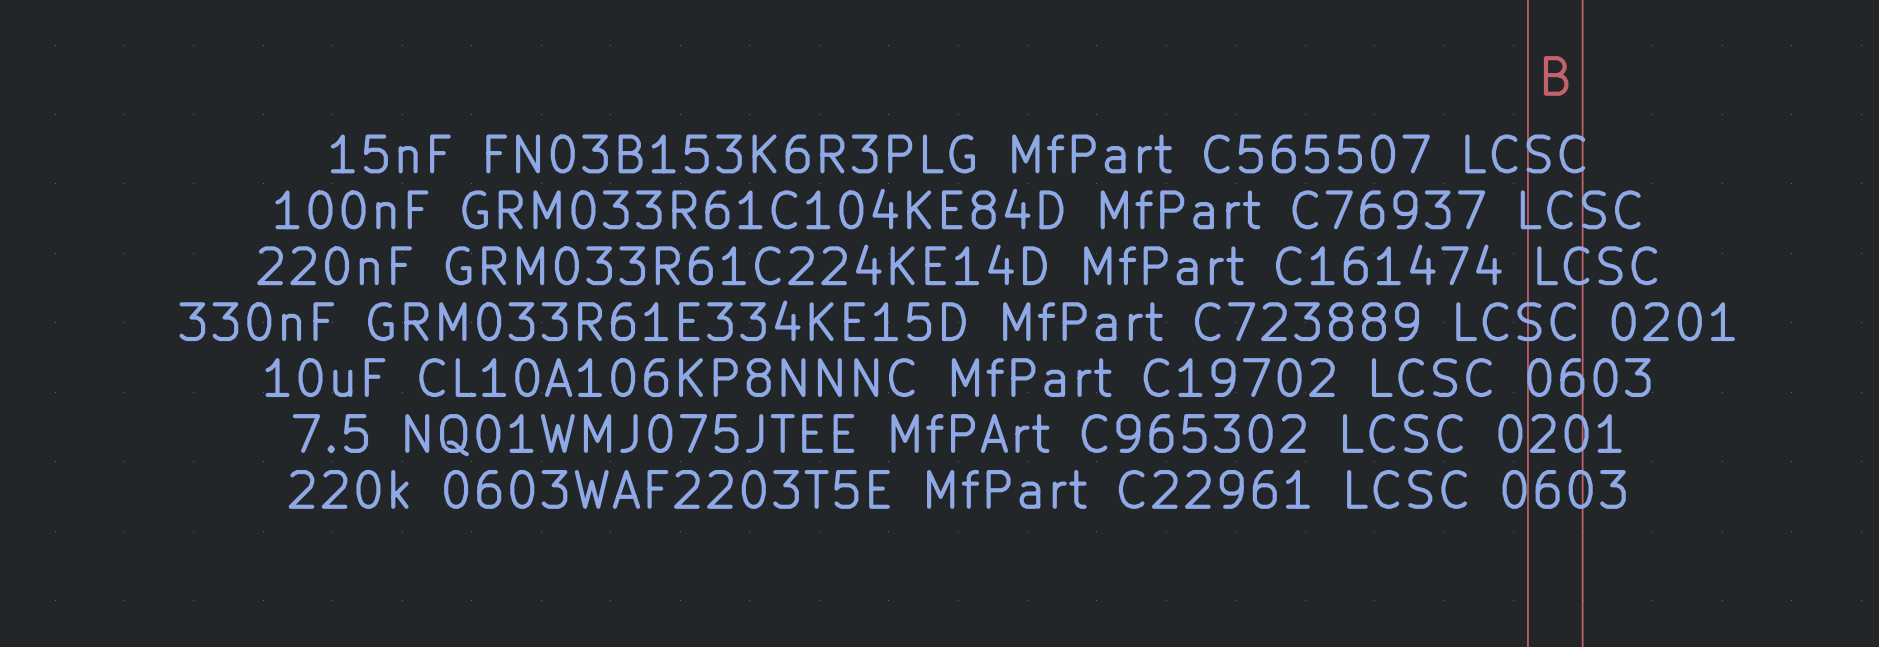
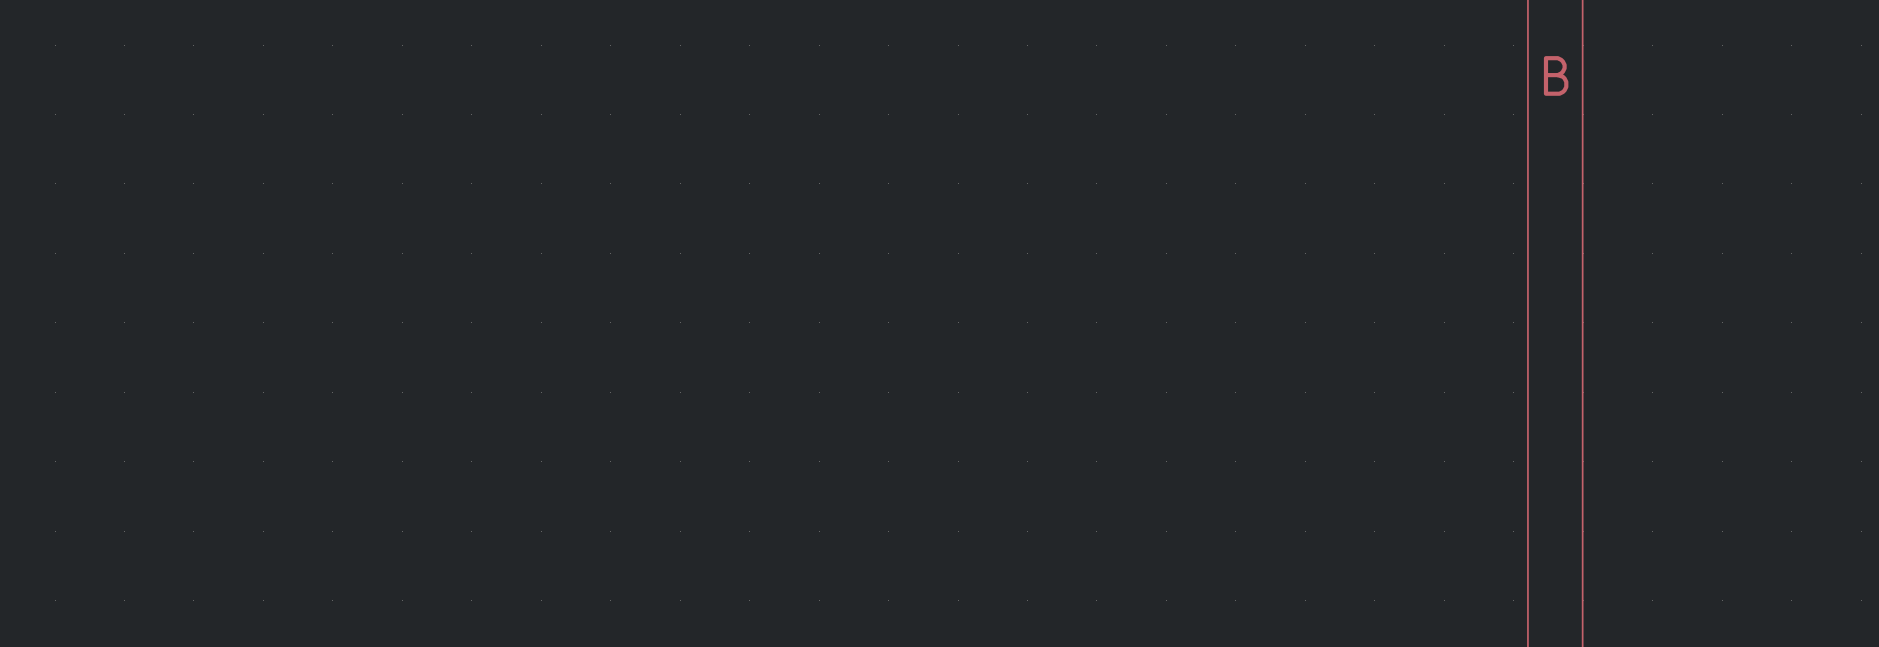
text: 15nF FN03B153K6R3PLG MfPart C565507 LCSC (958, 153) -> none
text: 100nF GRM033R61C104KE84D MfPart C76937 LCSC (958, 209) -> none
text: 220nF GRM033R61C224KE14D MfPart C161474 LCSC (957, 264) -> none
text: 330nF GRM033R61E334KE15D MfPart C723889 LCSC 0201 (957, 320) -> none
text: 10uF CL10A106KP8NNNC MfPart C19702 LCSC 0603 (958, 377) -> none
text: 7.5 NQ01WMJ075JTEE MfPArt C965302 LCSC 0201 (957, 435) -> none
text: 220k 0603WAF2203T5E MfPart C22961 LCSC 0603 (957, 489) -> none

